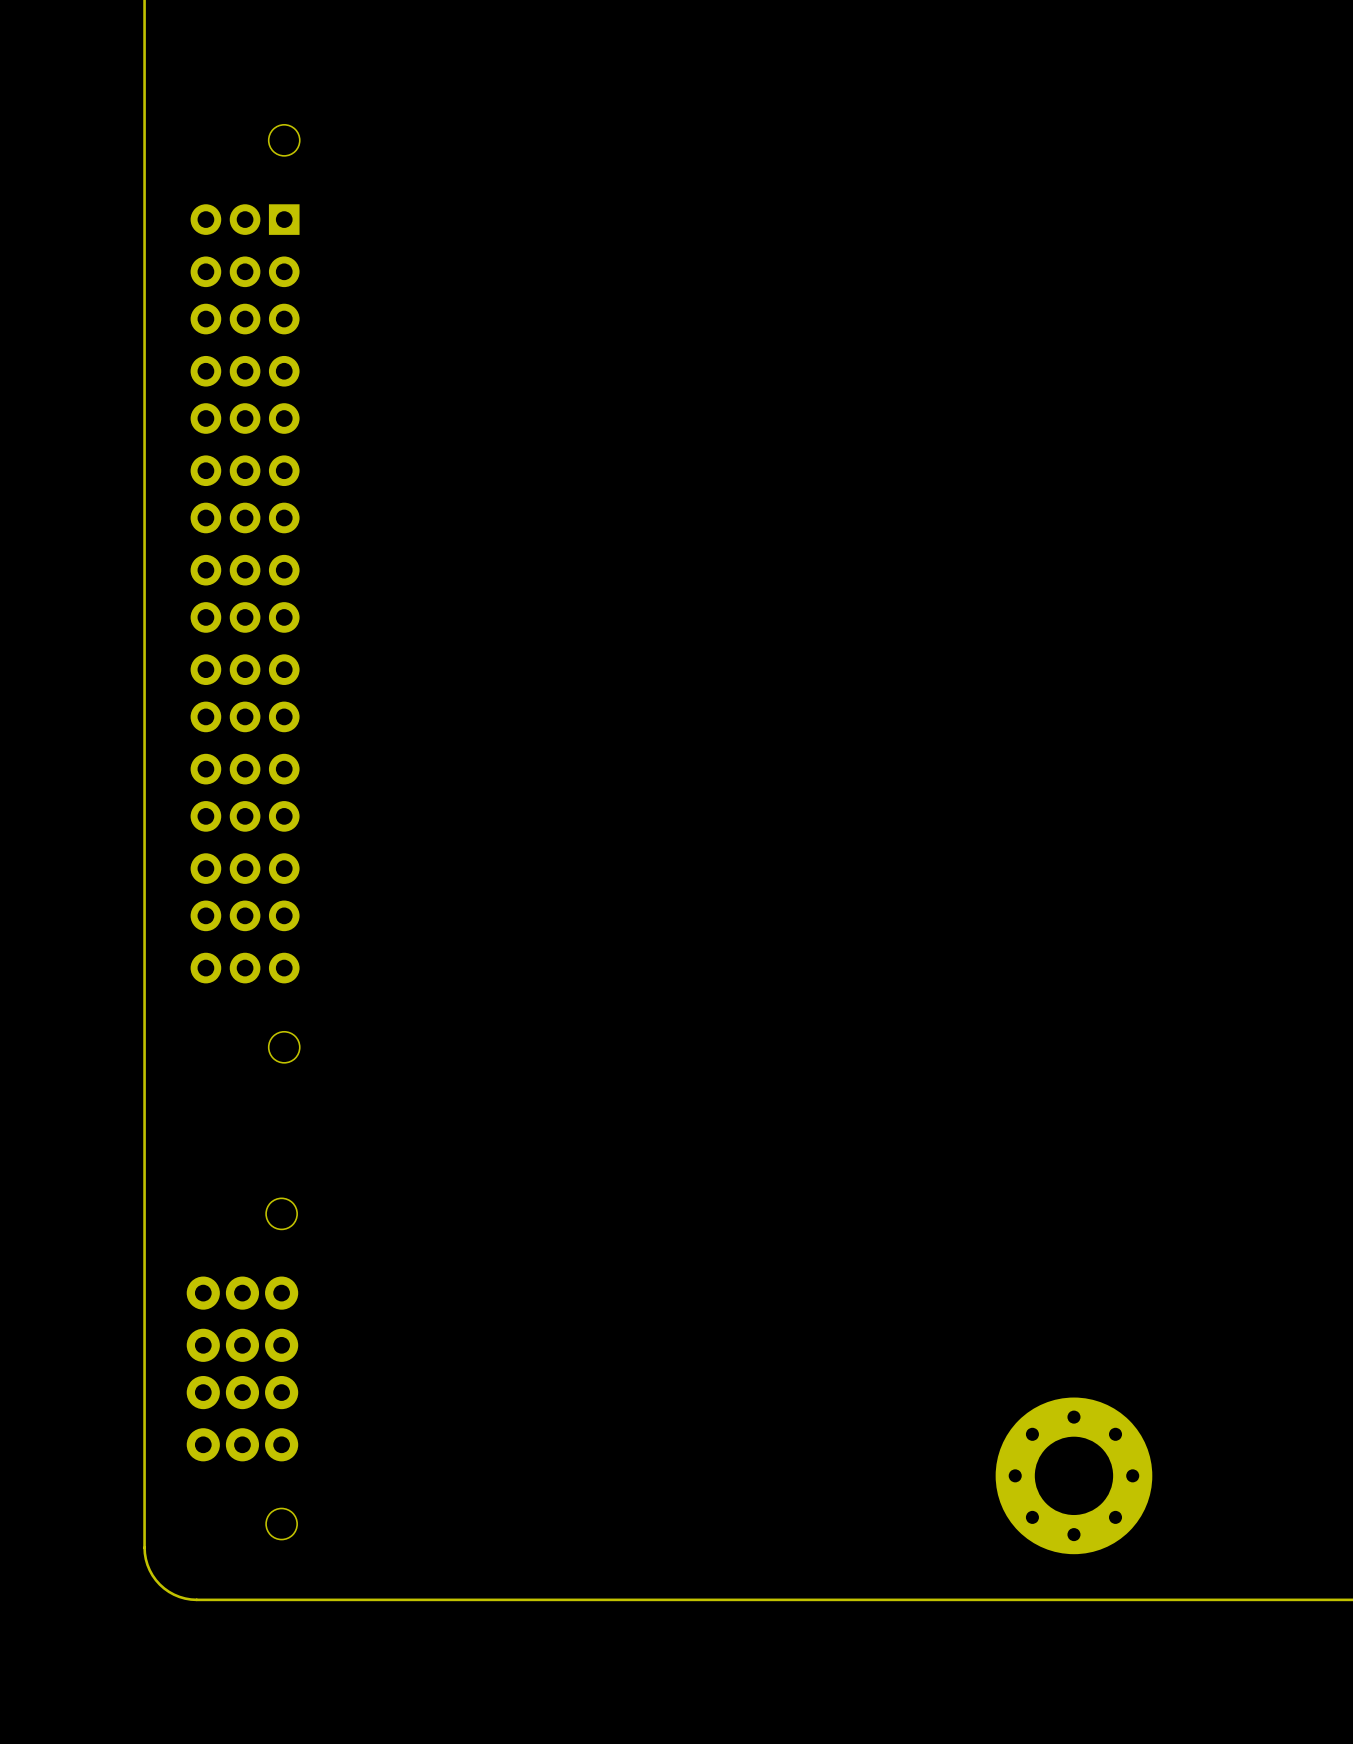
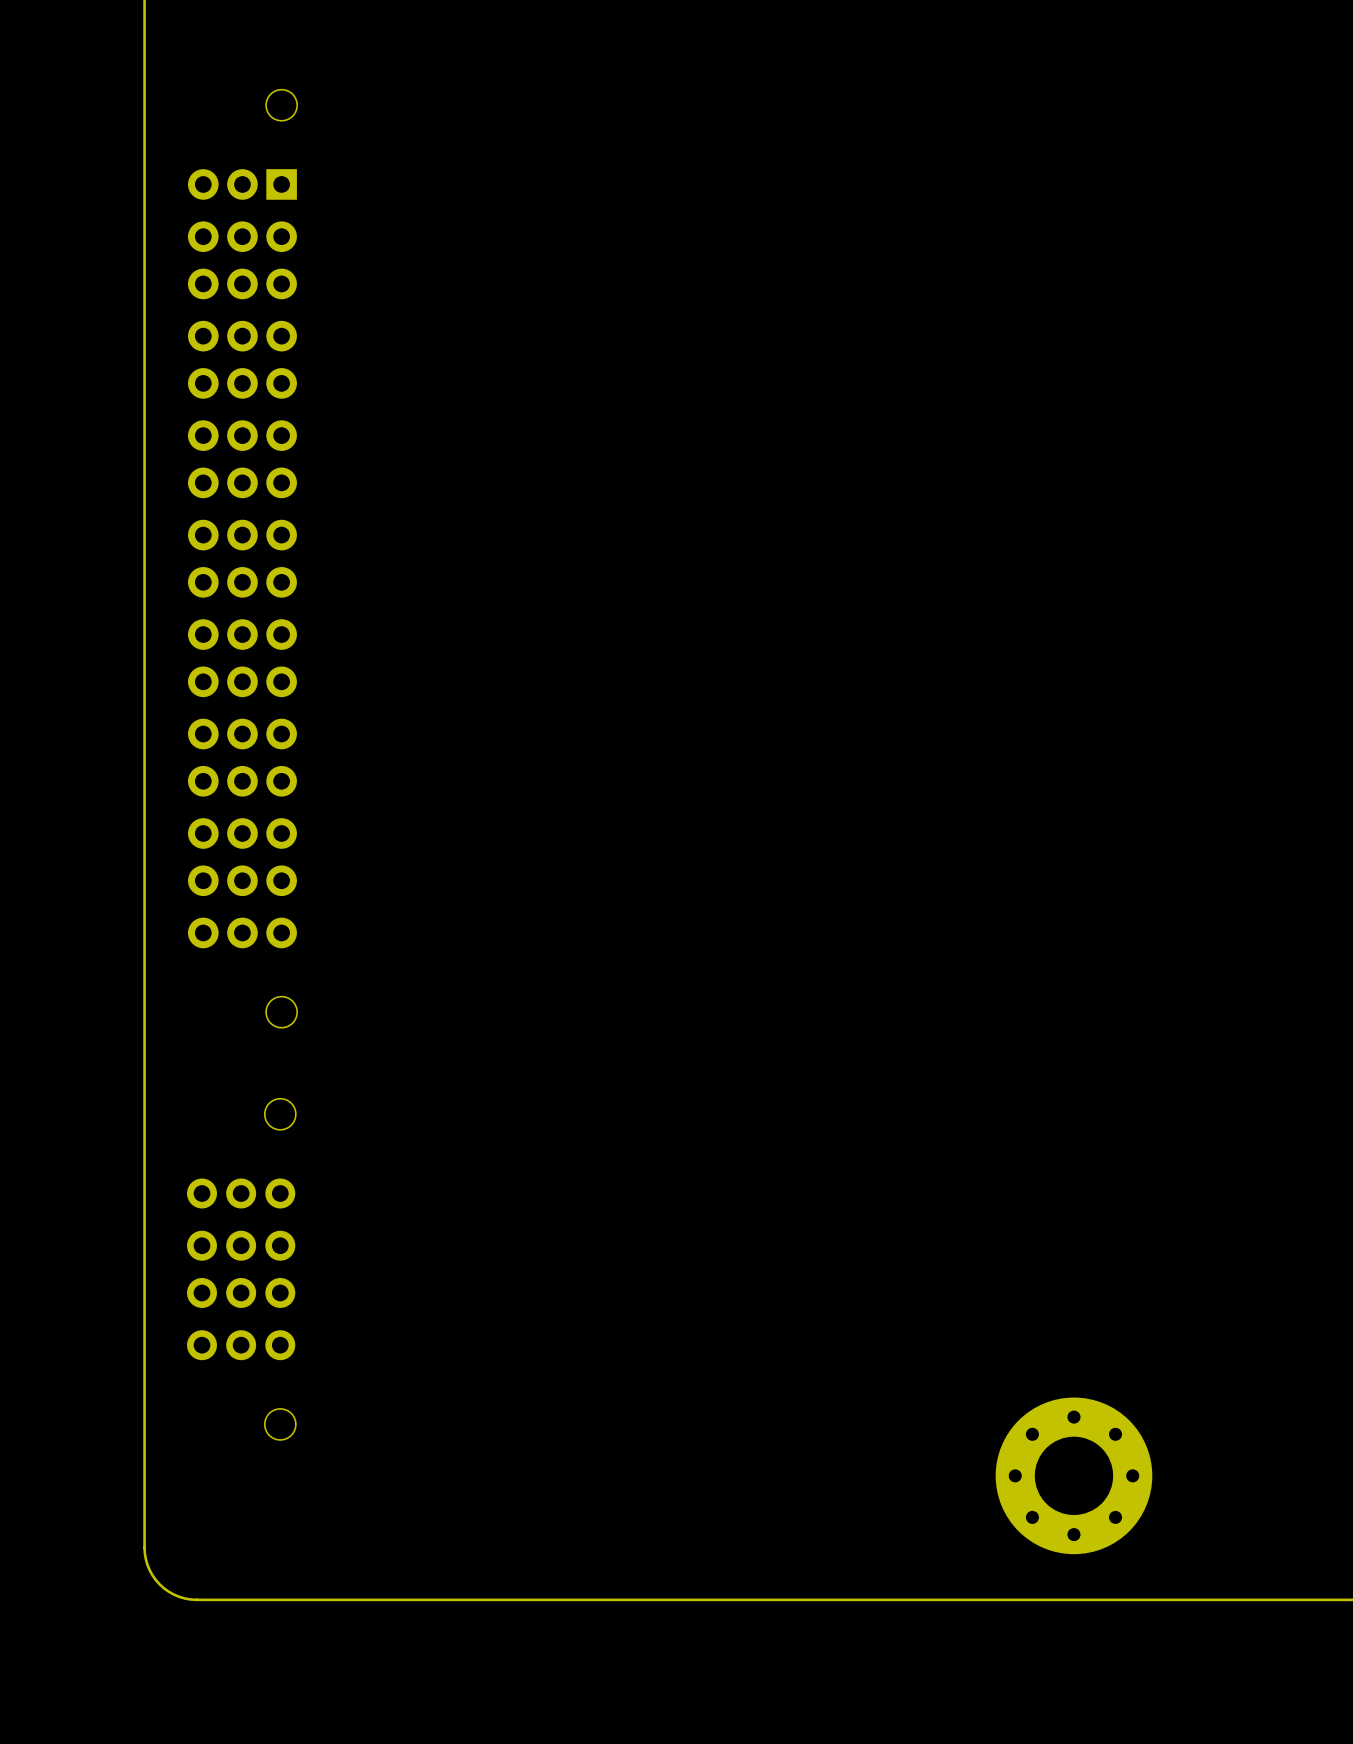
part position: (245, 593) -> (242, 558)
part: none -> (241, 1269)
part: (242, 1368) -> none

